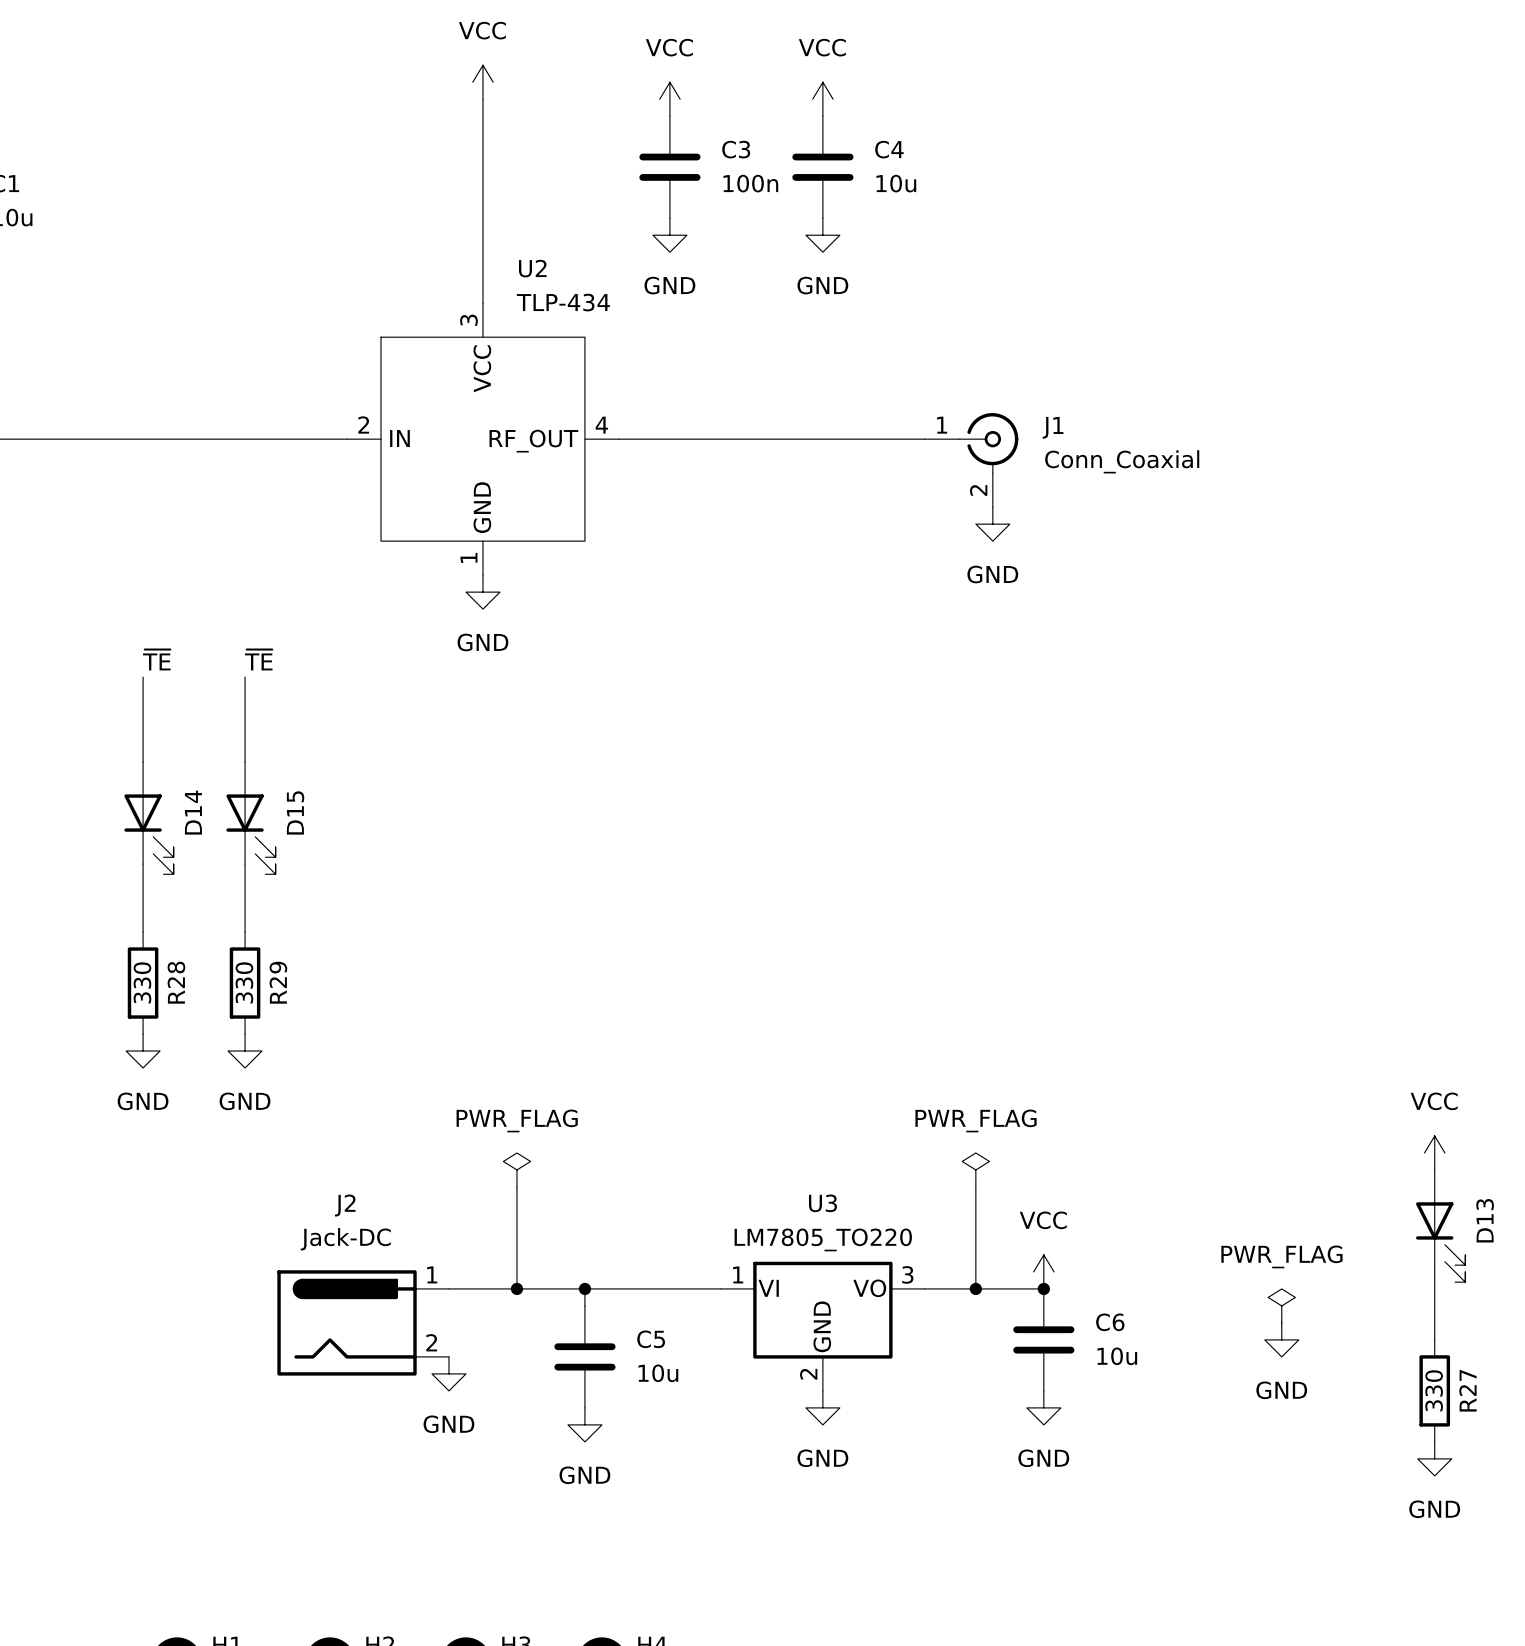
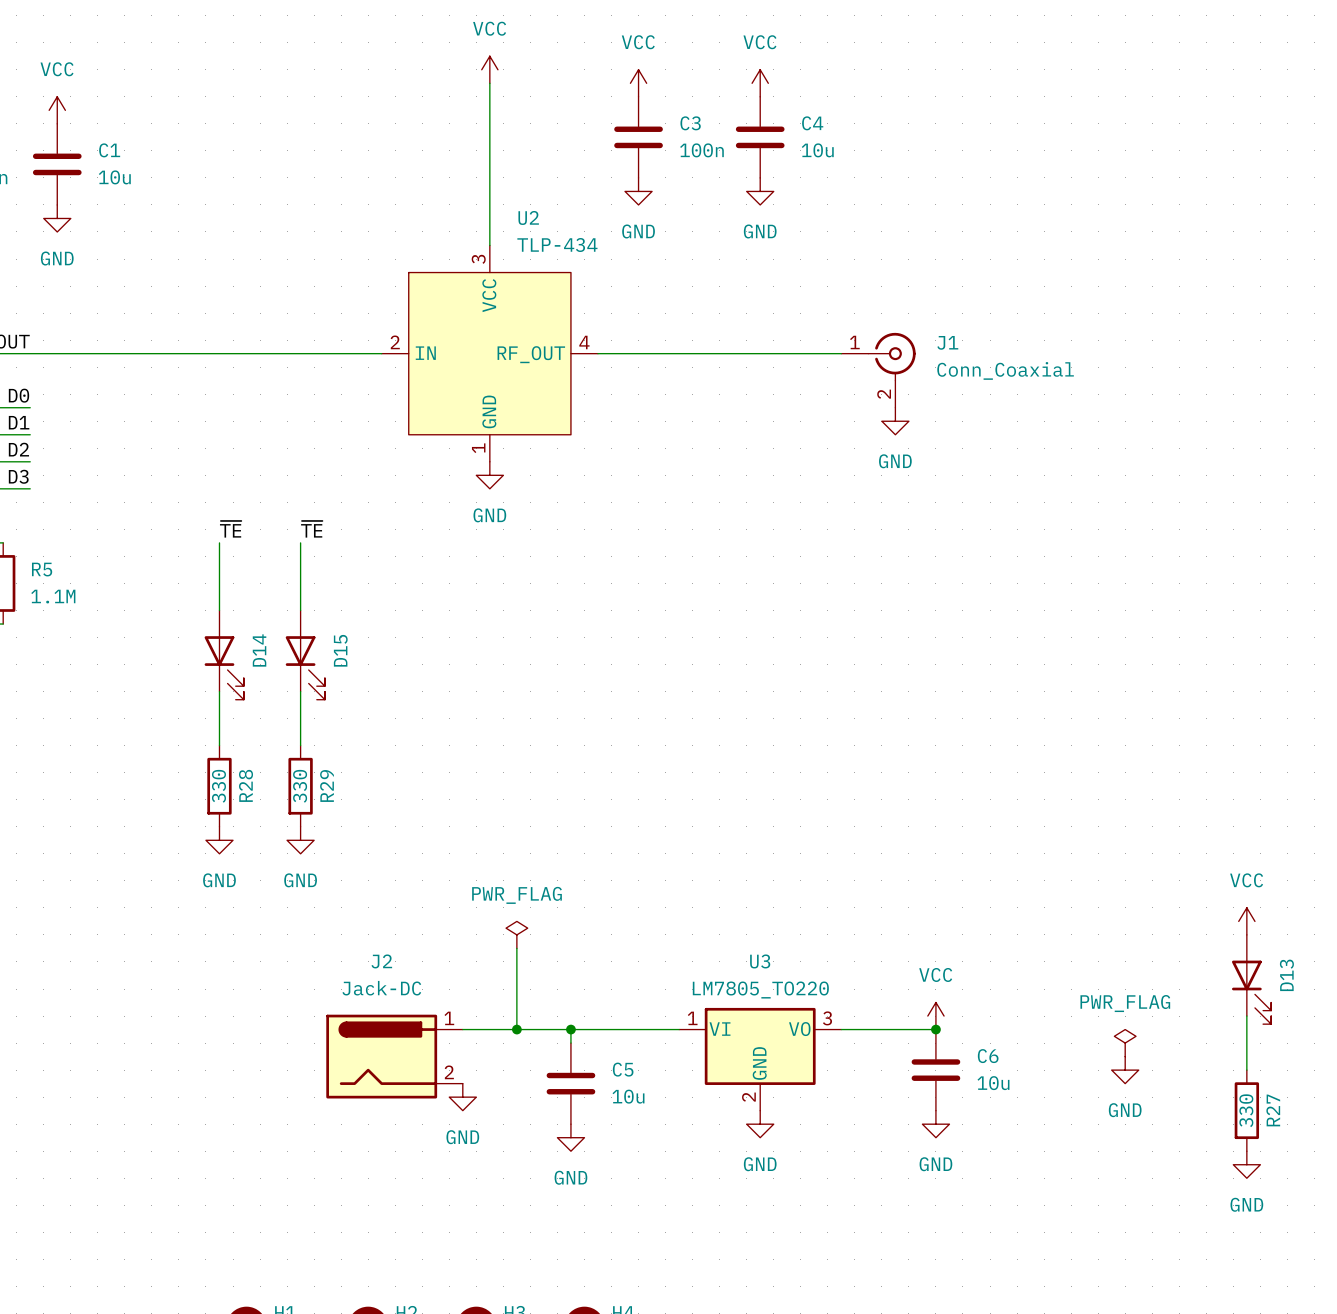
power symbol: PWR_FLAG (975, 1169) -> none
wire: (975, 1186) (975, 1288) -> none
junction: (975, 1288) -> none

